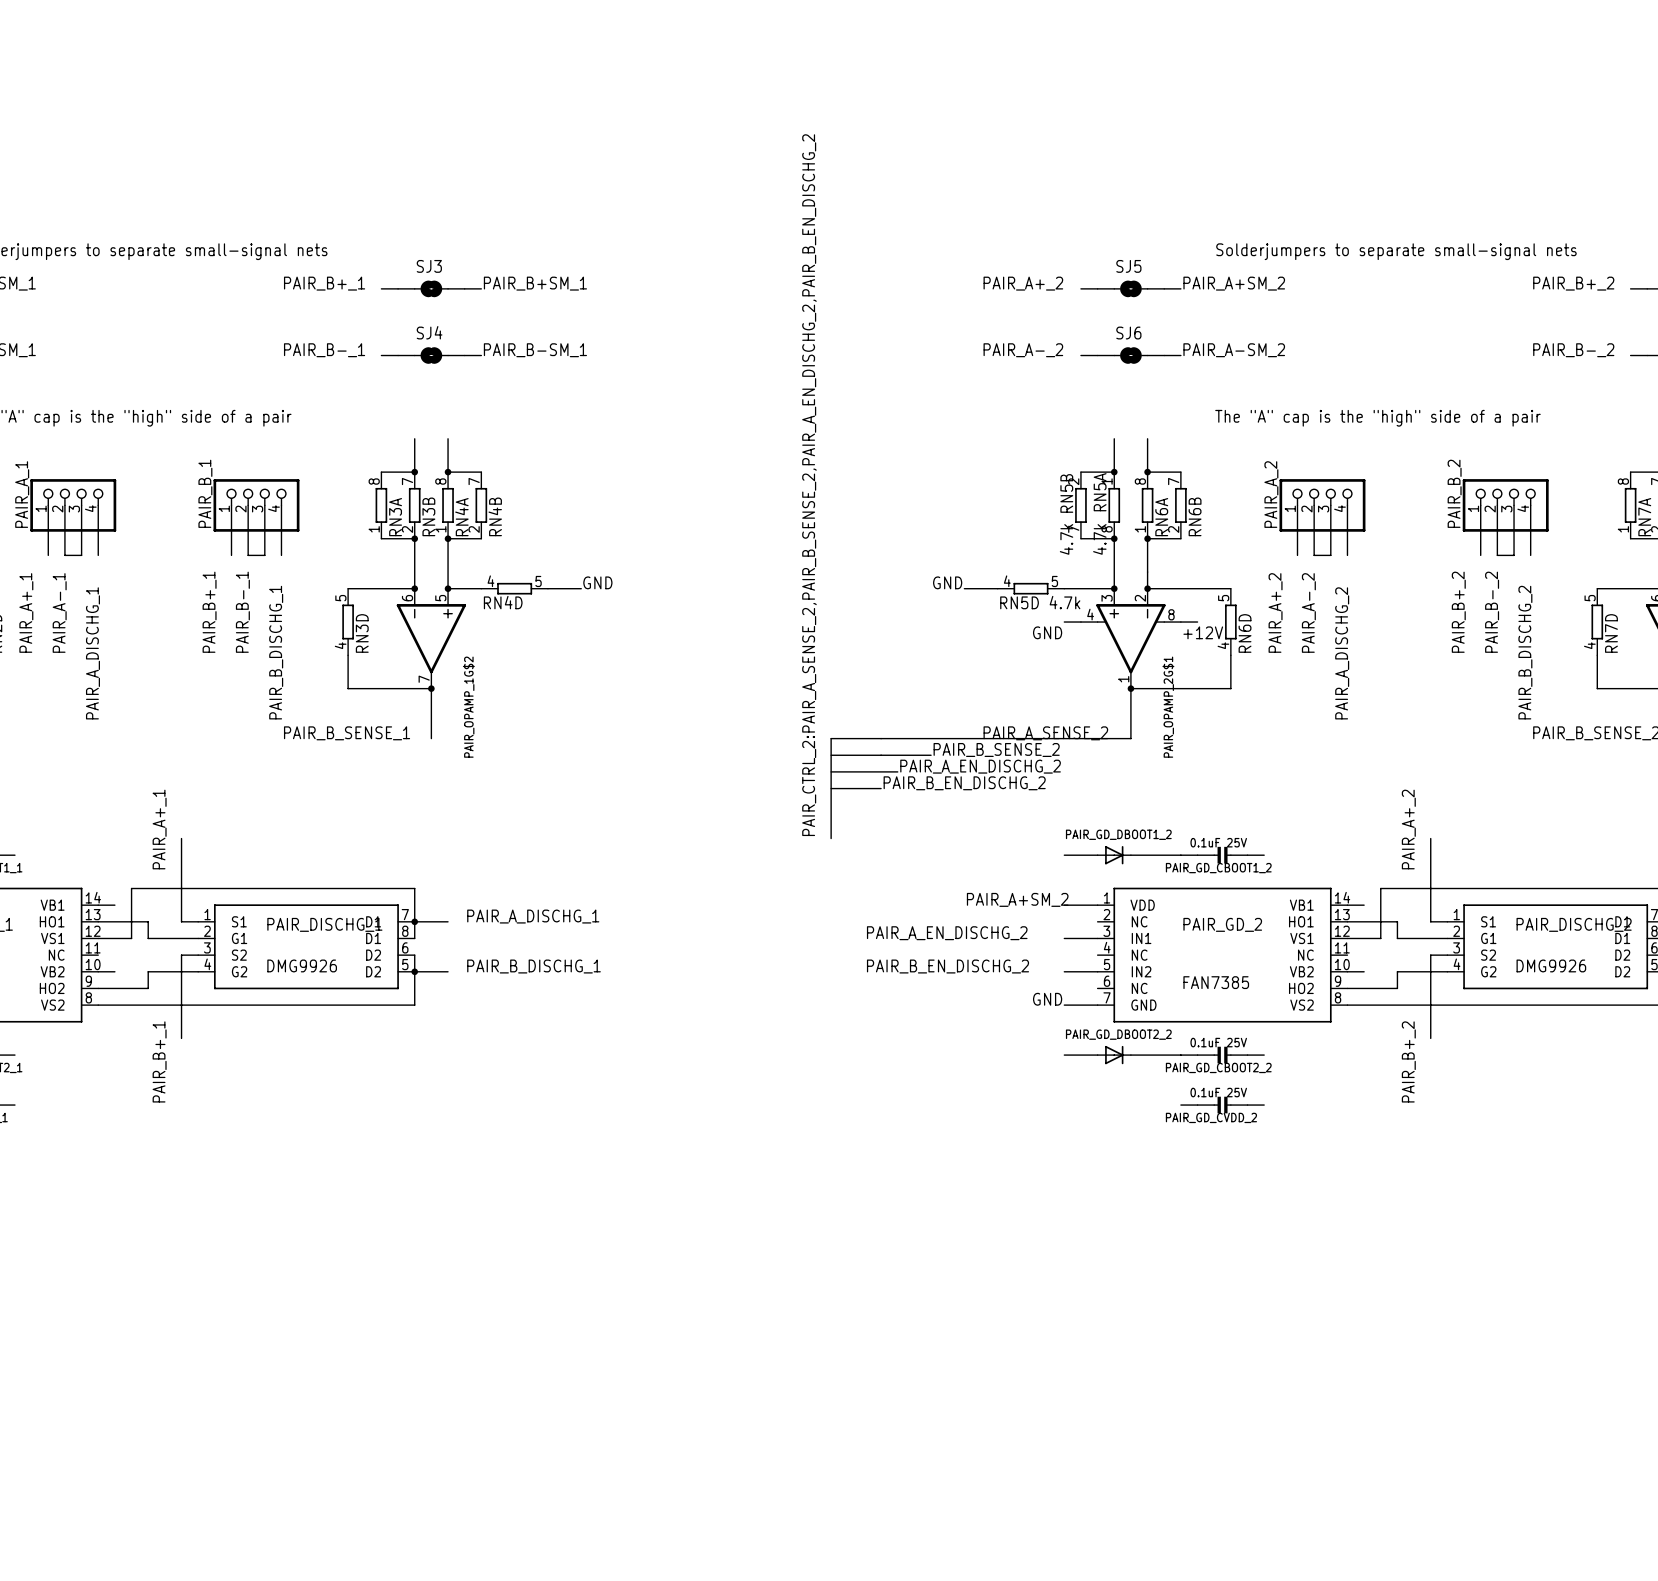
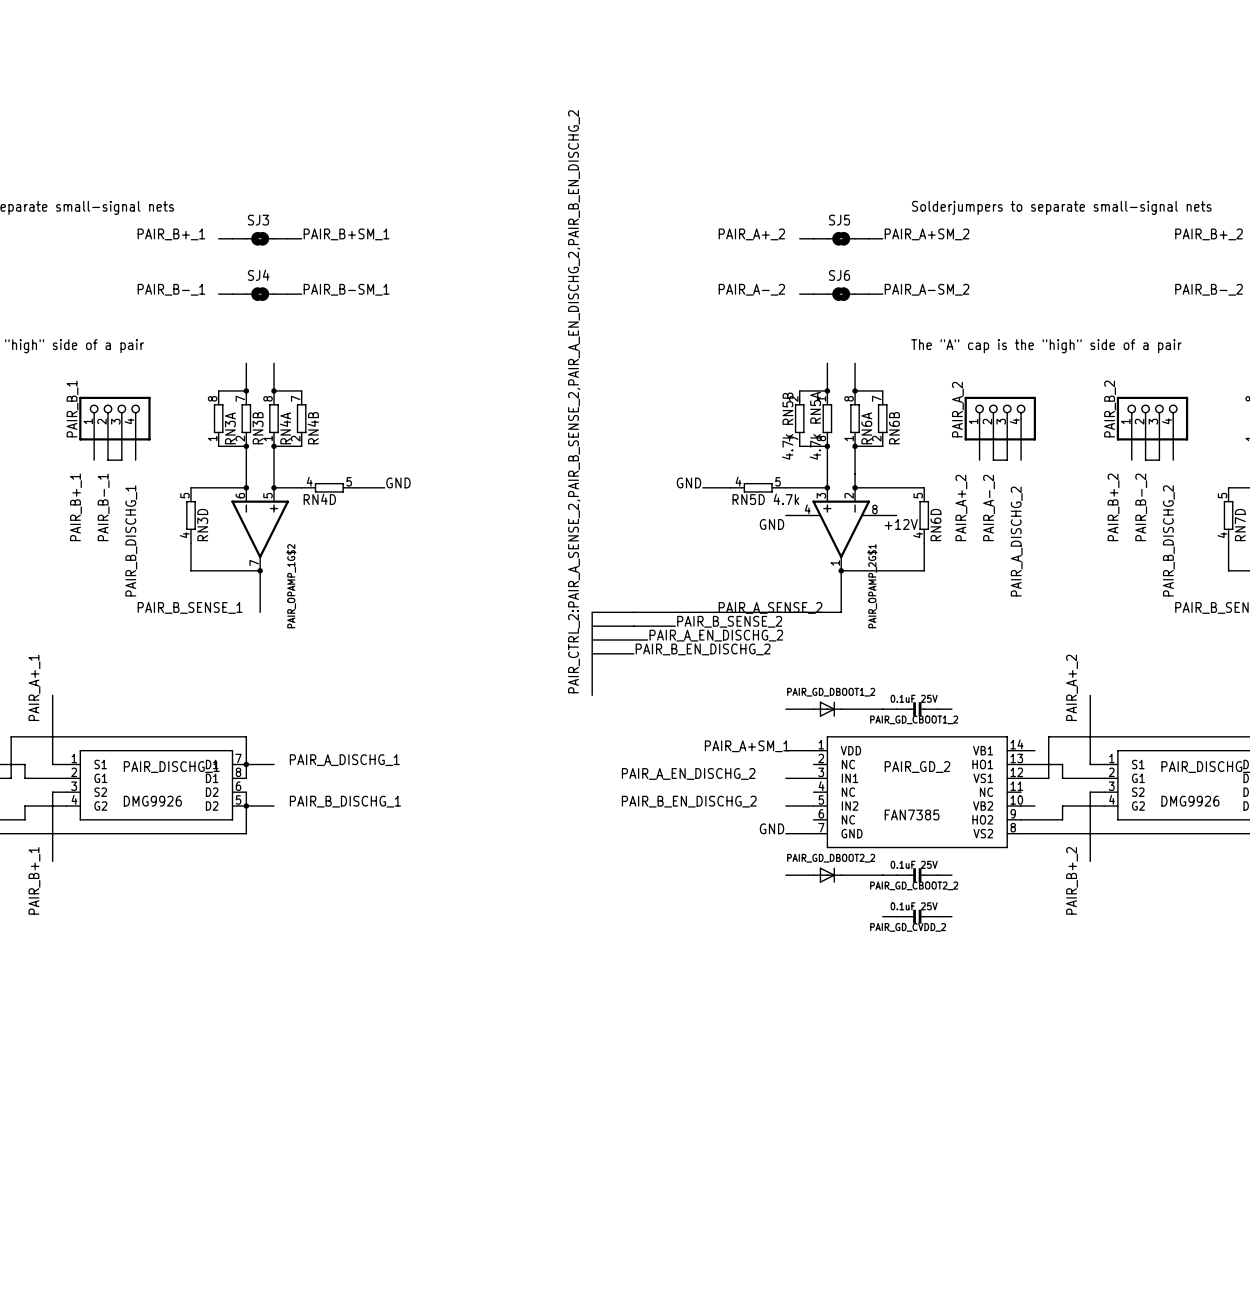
label: PAIR_A+SM_2 (1017, 899) -> PAIR_A+SM_1 (747, 746)

